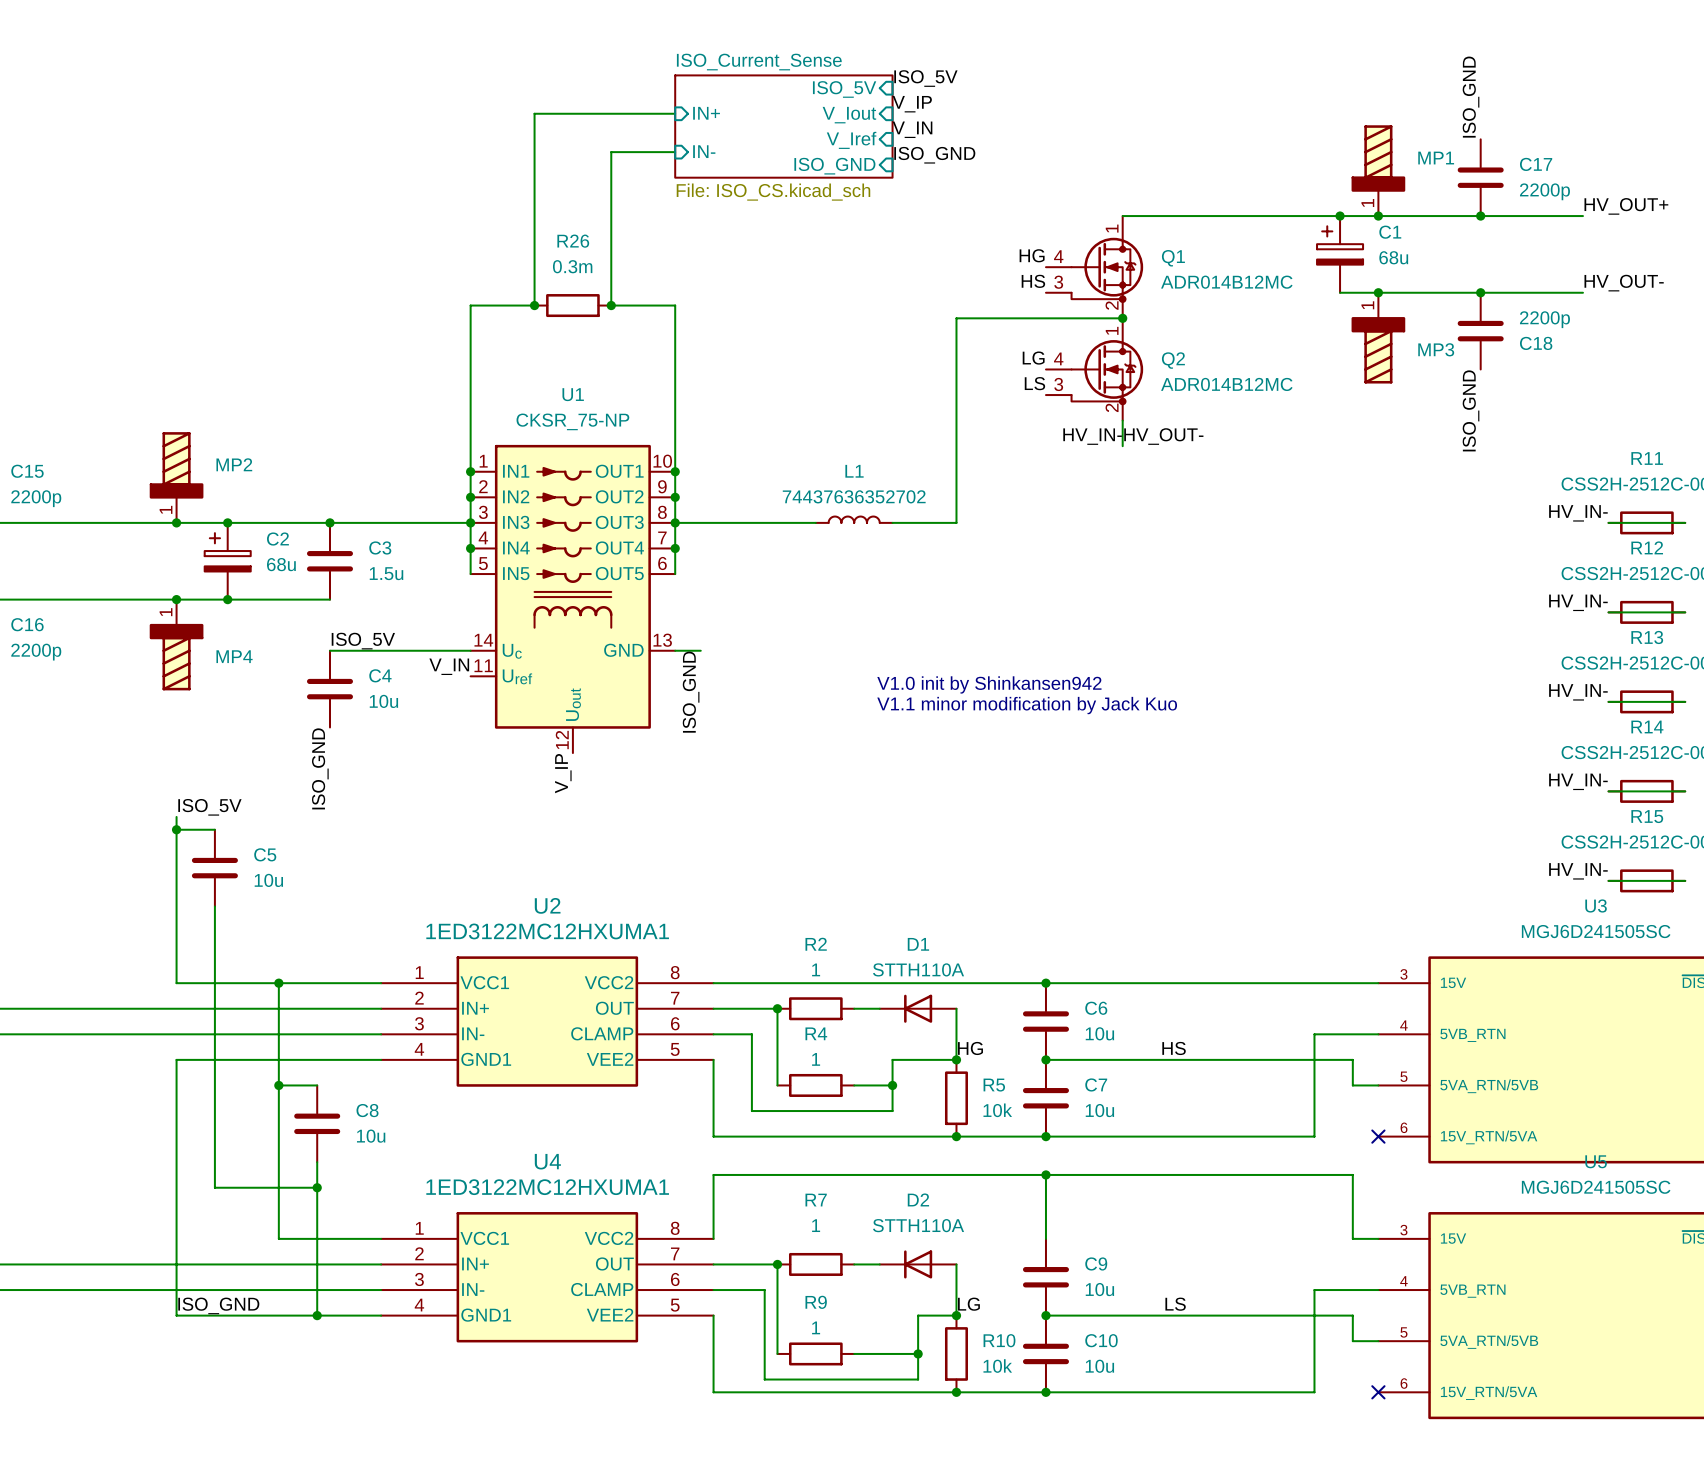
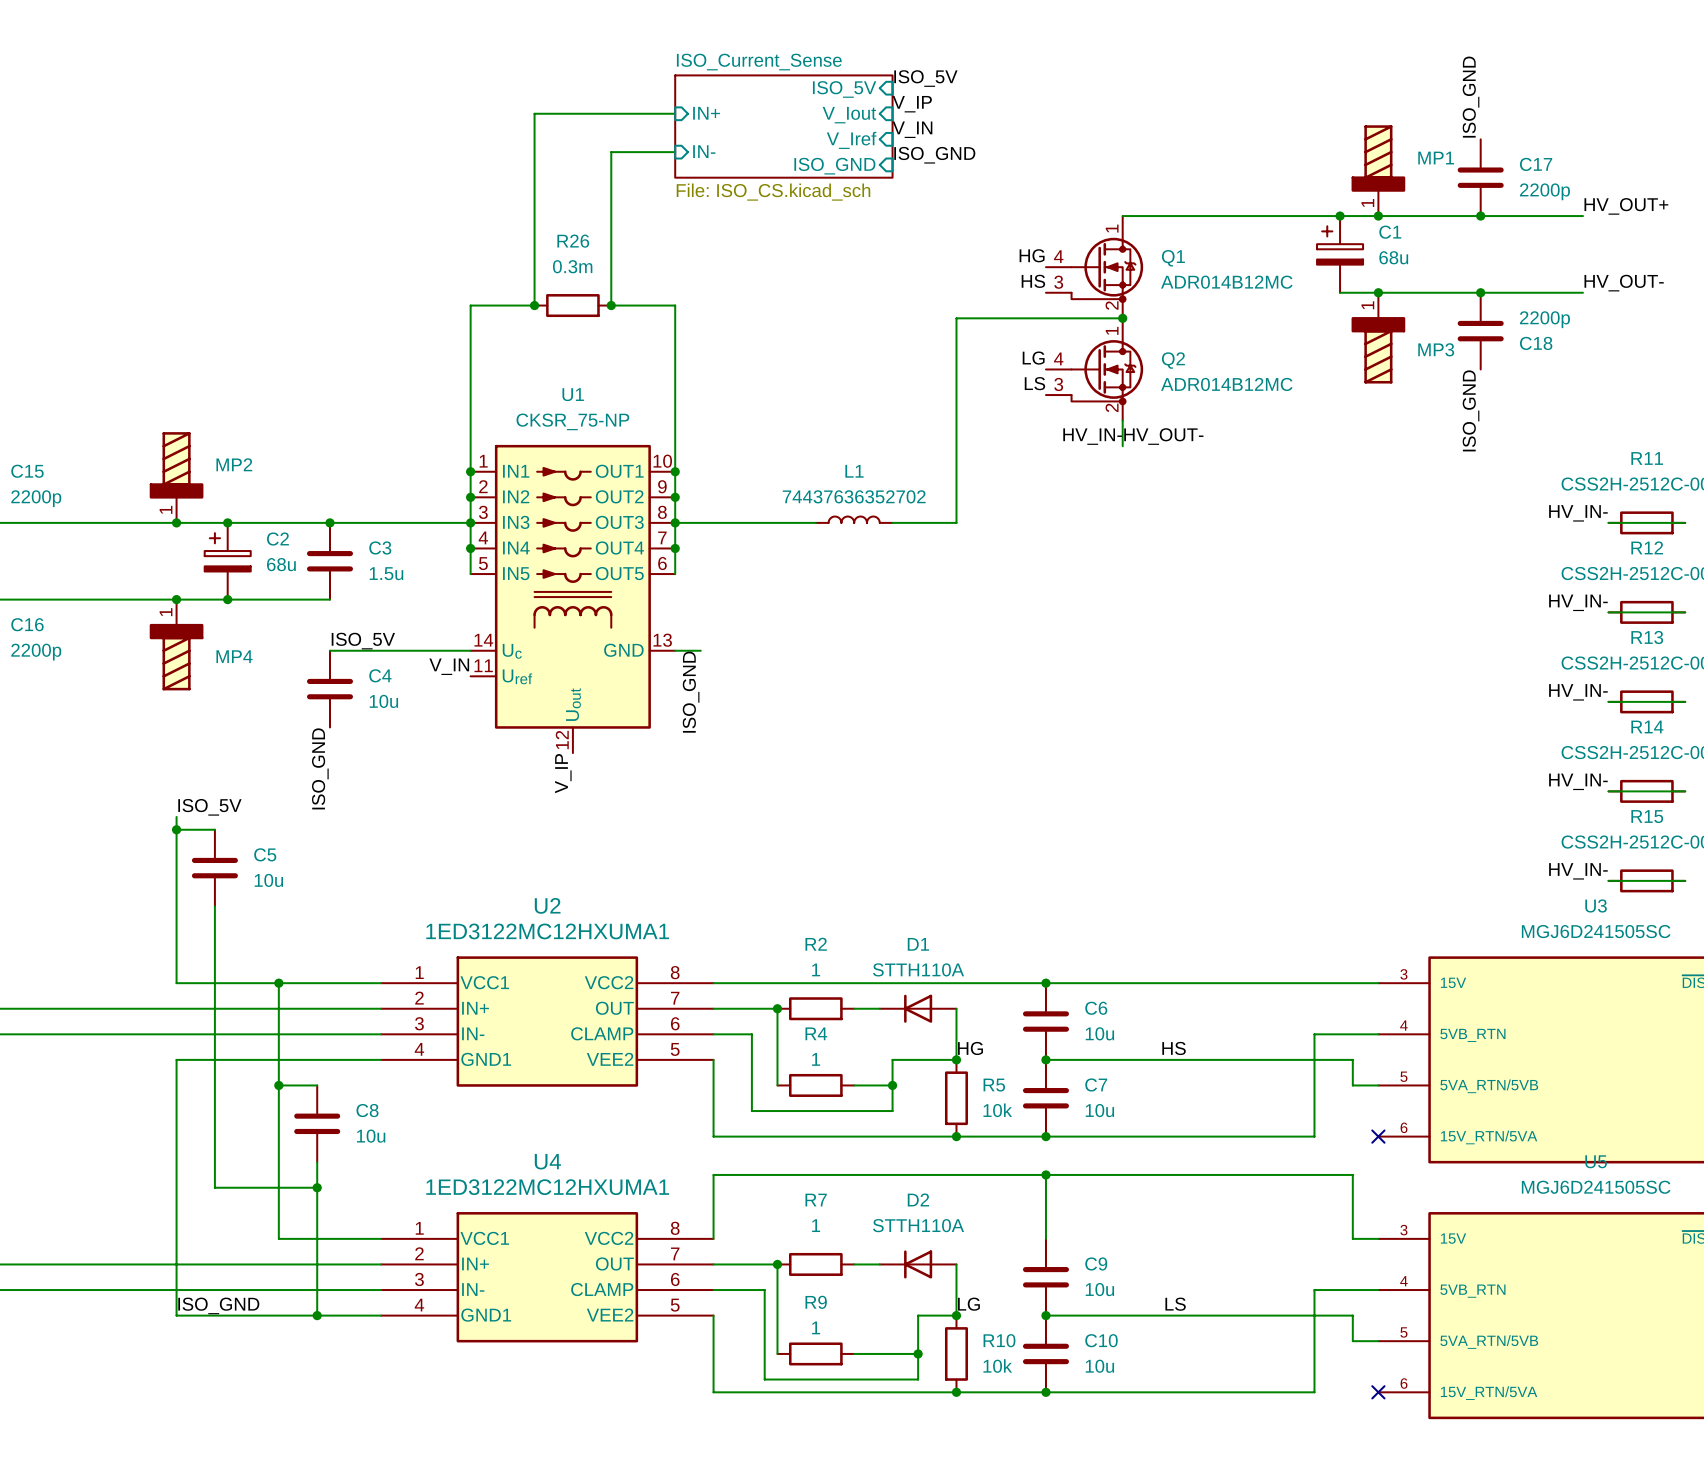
text: V1.0 init by Shinkansen942 (989, 684) -> none
text: V1.1 minor modification by Jack Kuo (1027, 705) -> none

